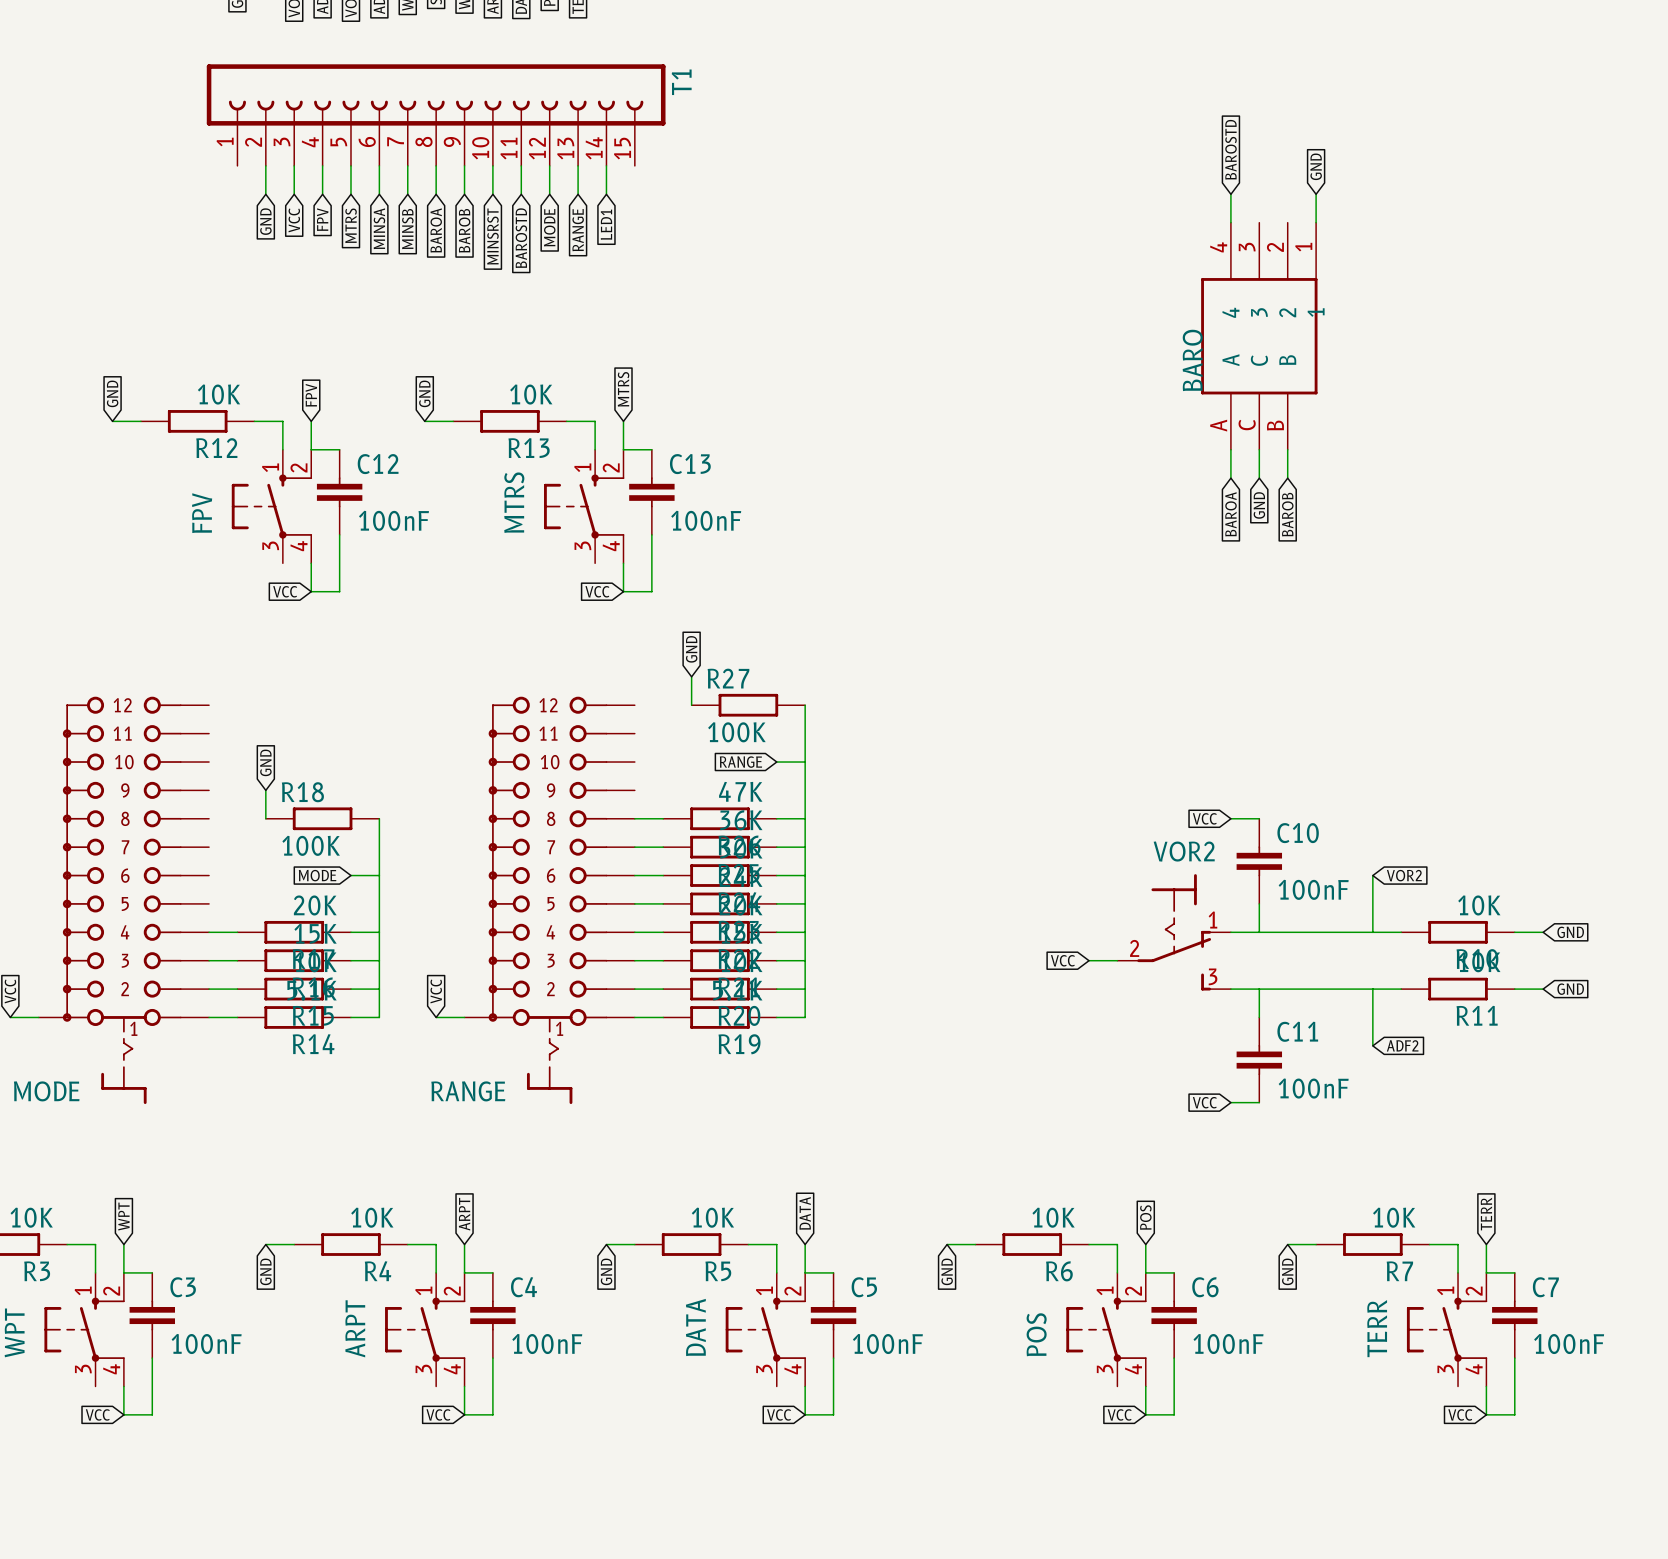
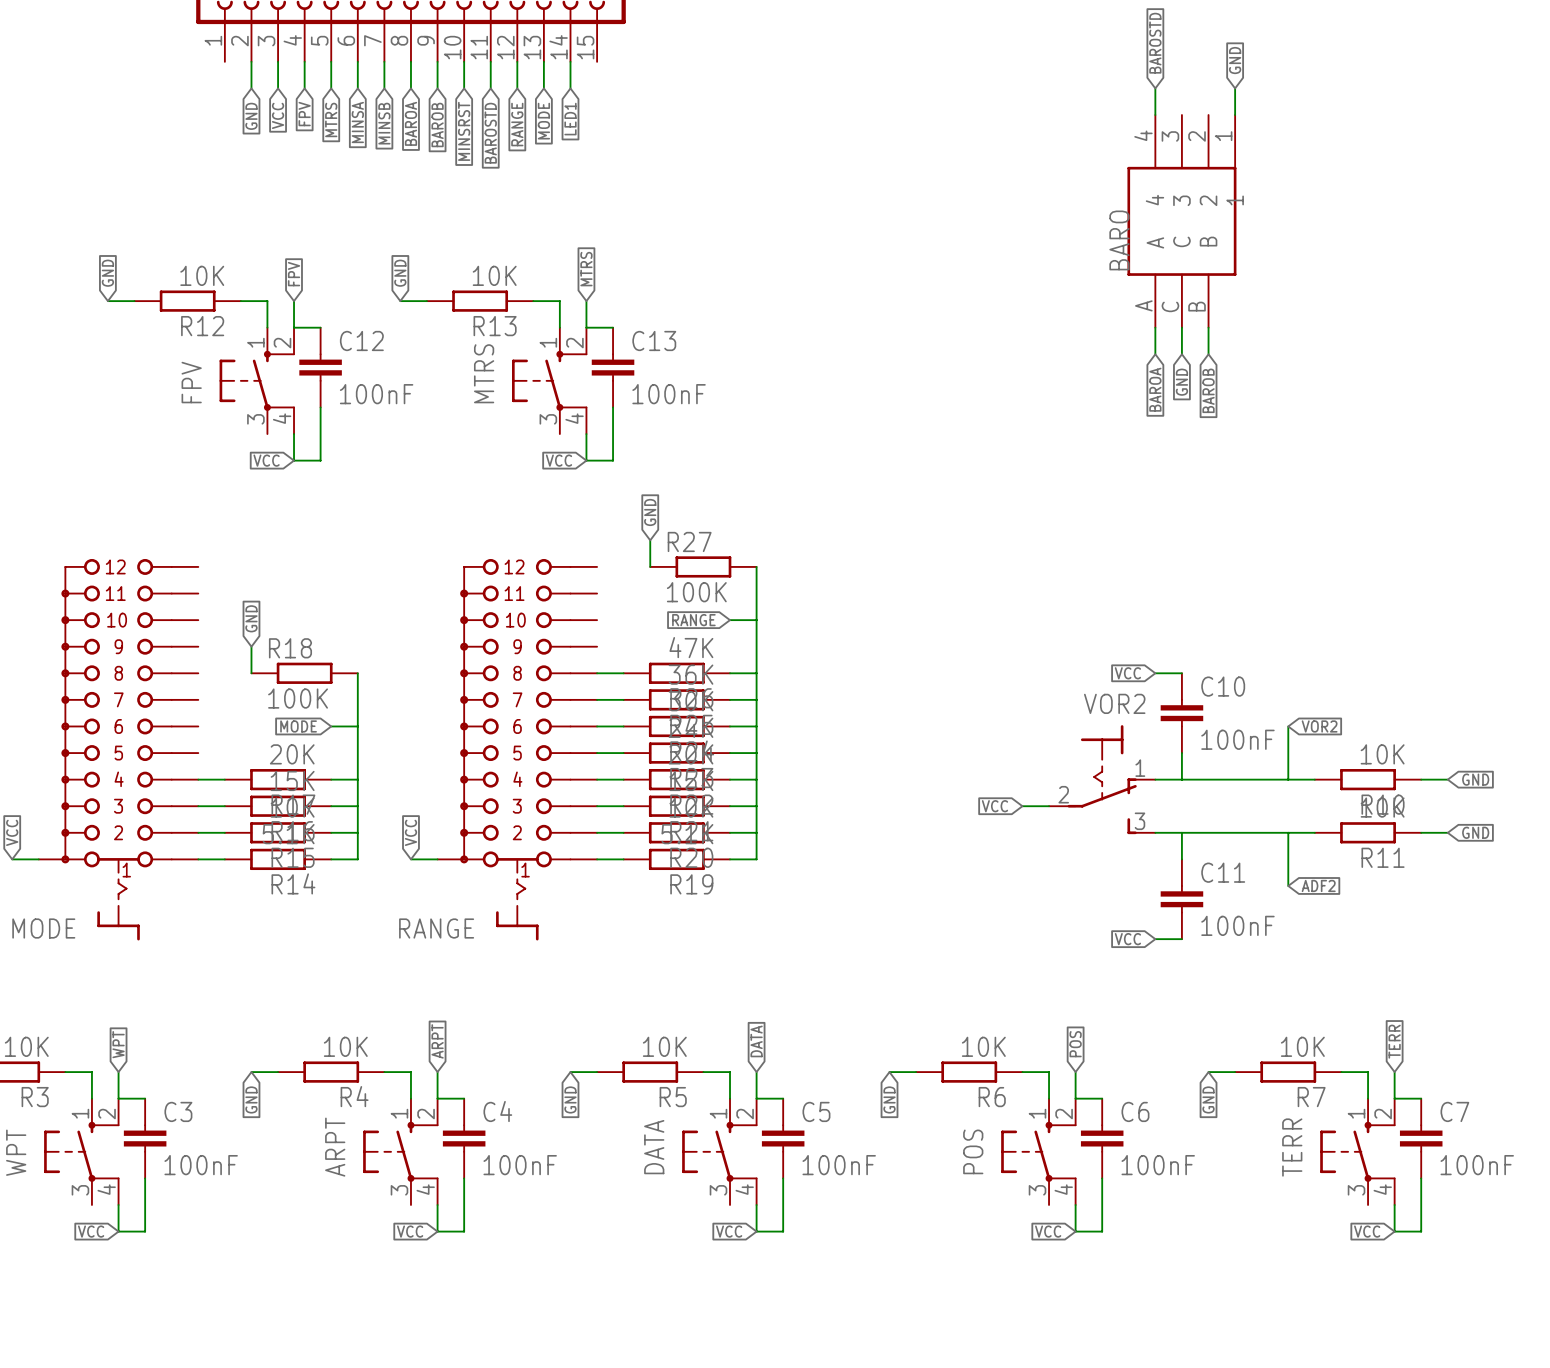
global label: MODE (549, 227) -> RANGE (517, 124)
global label: RANGE (578, 230) -> MODE (543, 121)

